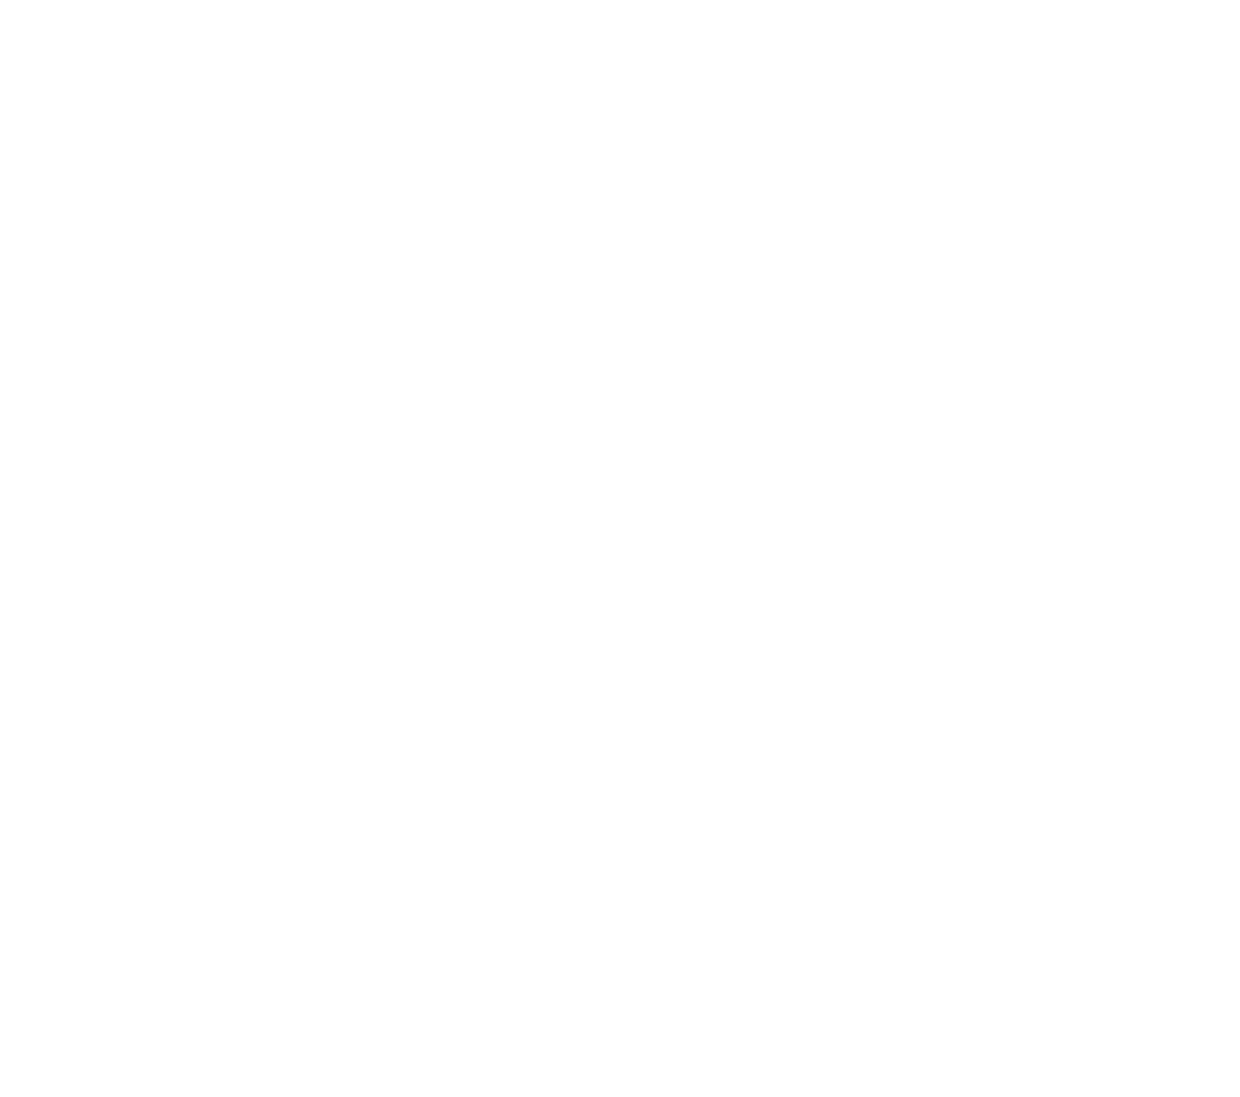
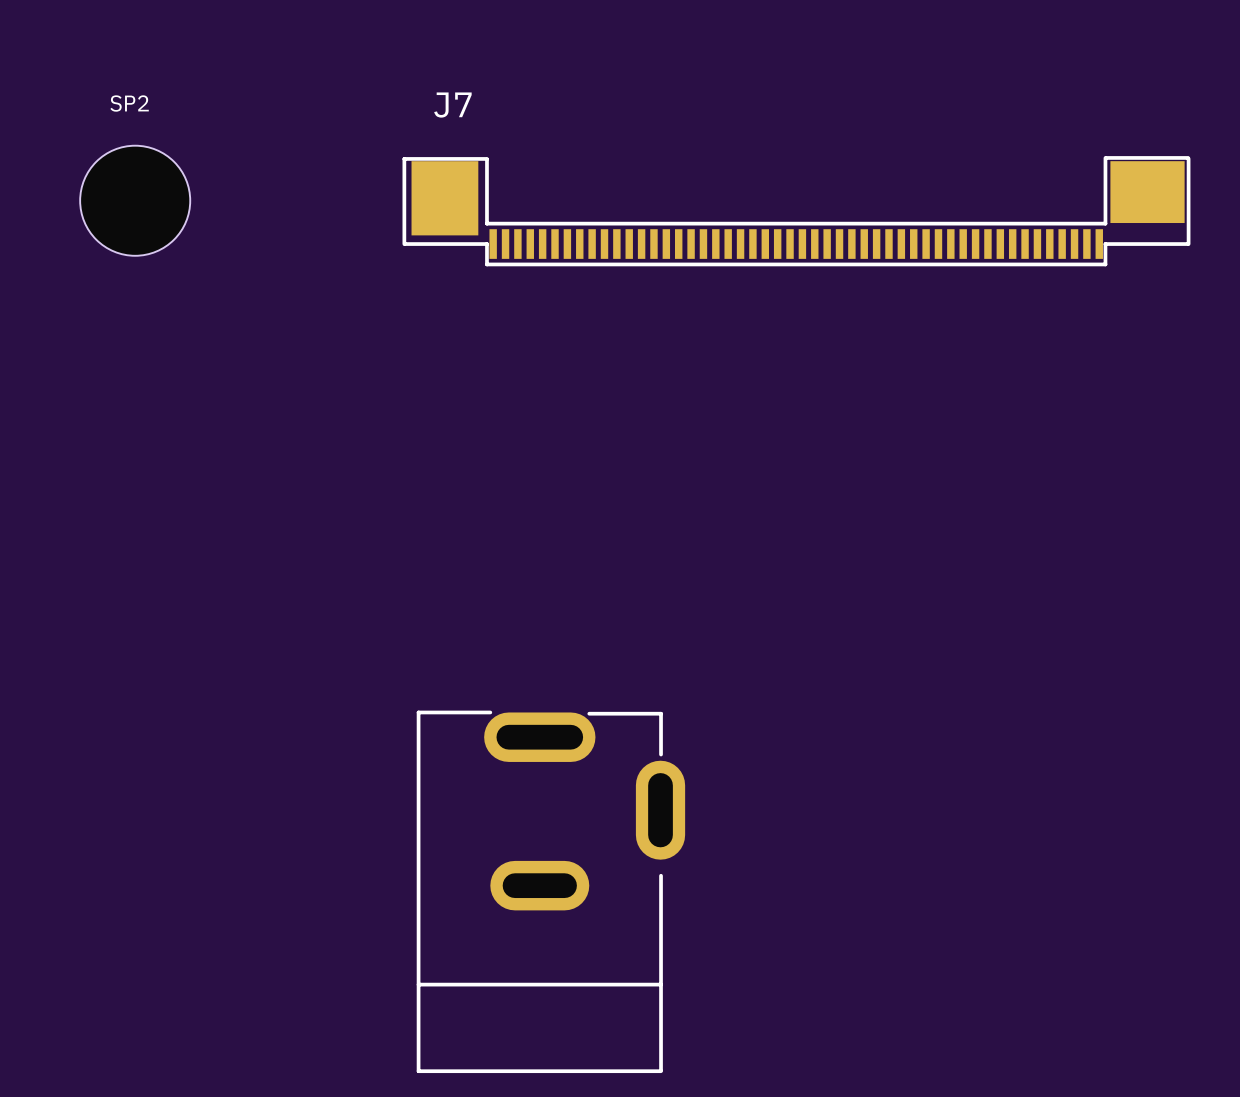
SP2: none -> (135, 200)
J7: none -> (796, 211)
part: none -> (550, 891)

